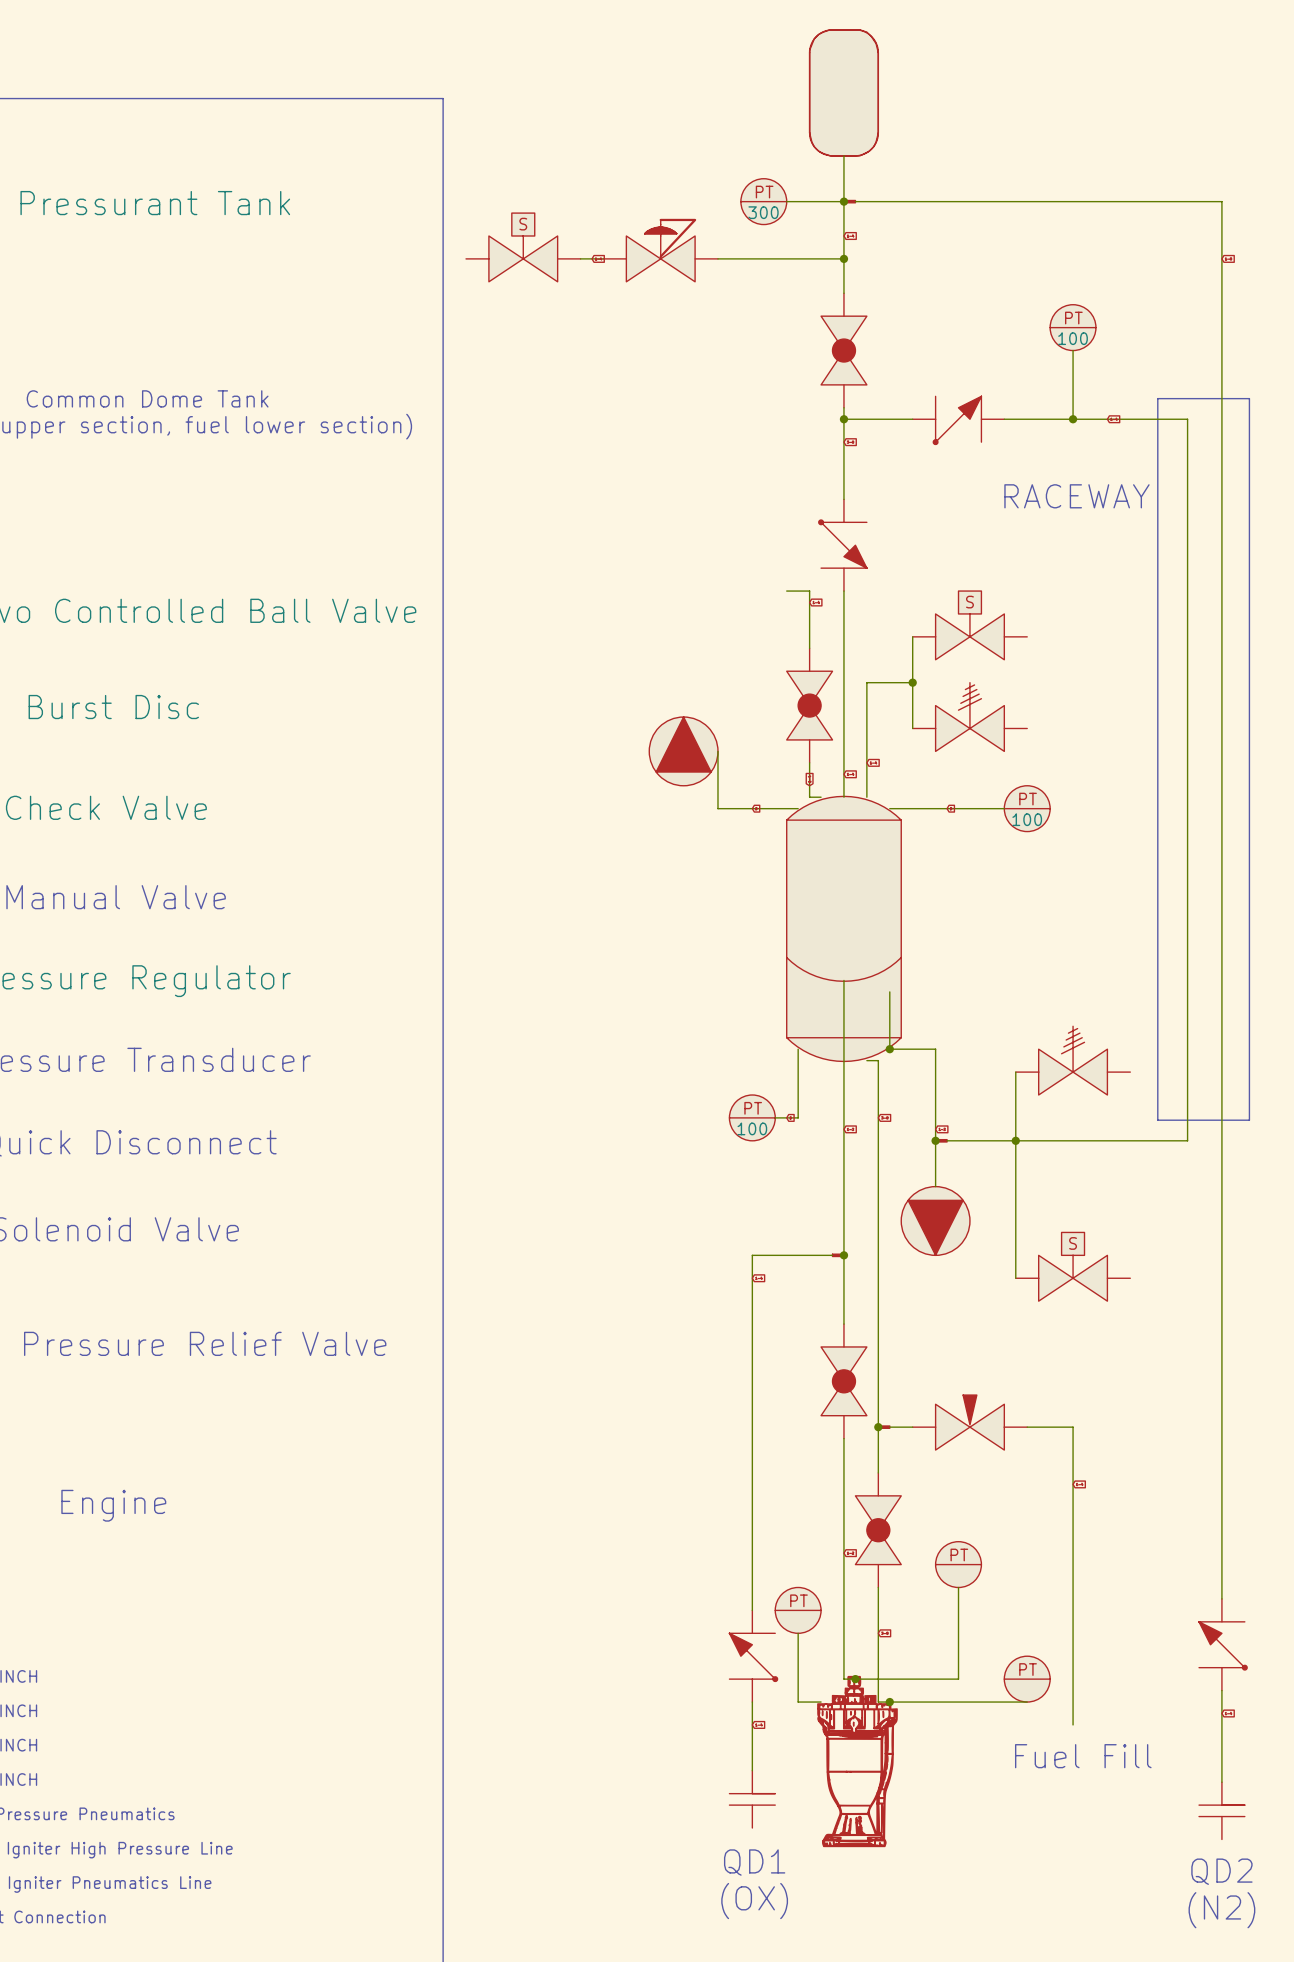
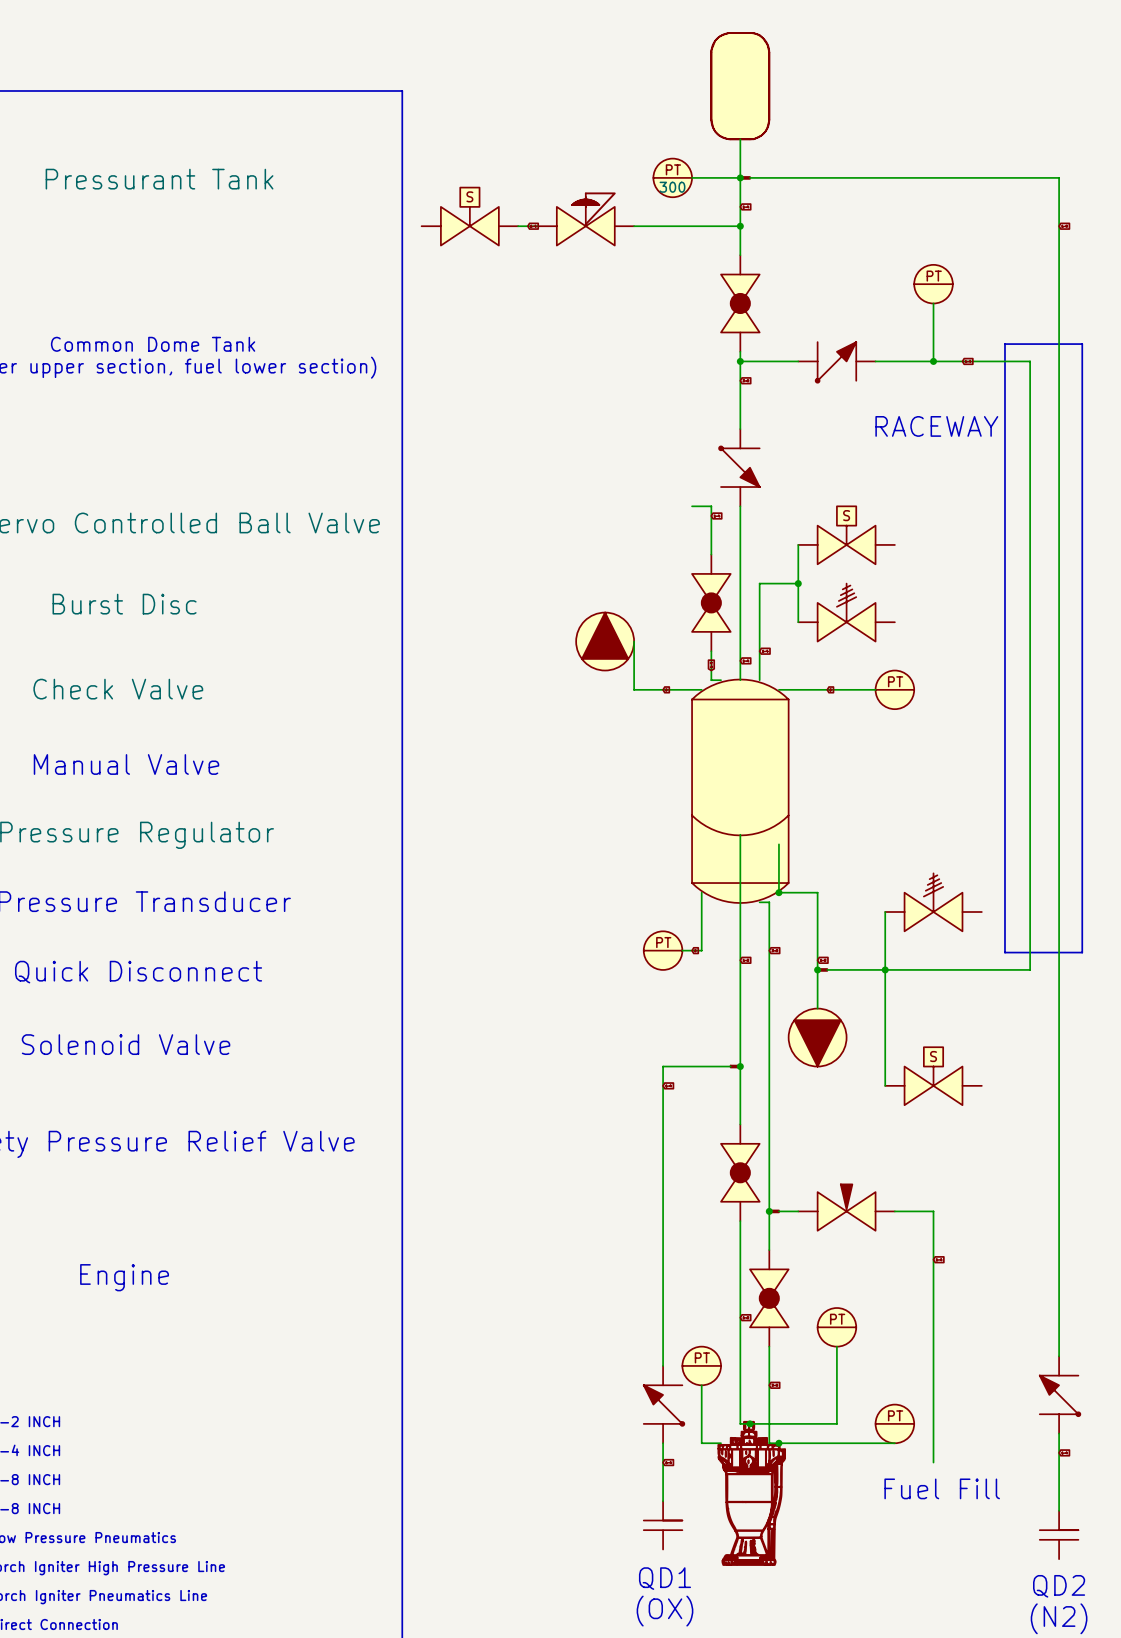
part value: 100 (1073, 338) -> none
part value: 100 (1027, 819) -> none
part value: 100 (752, 1128) -> none

